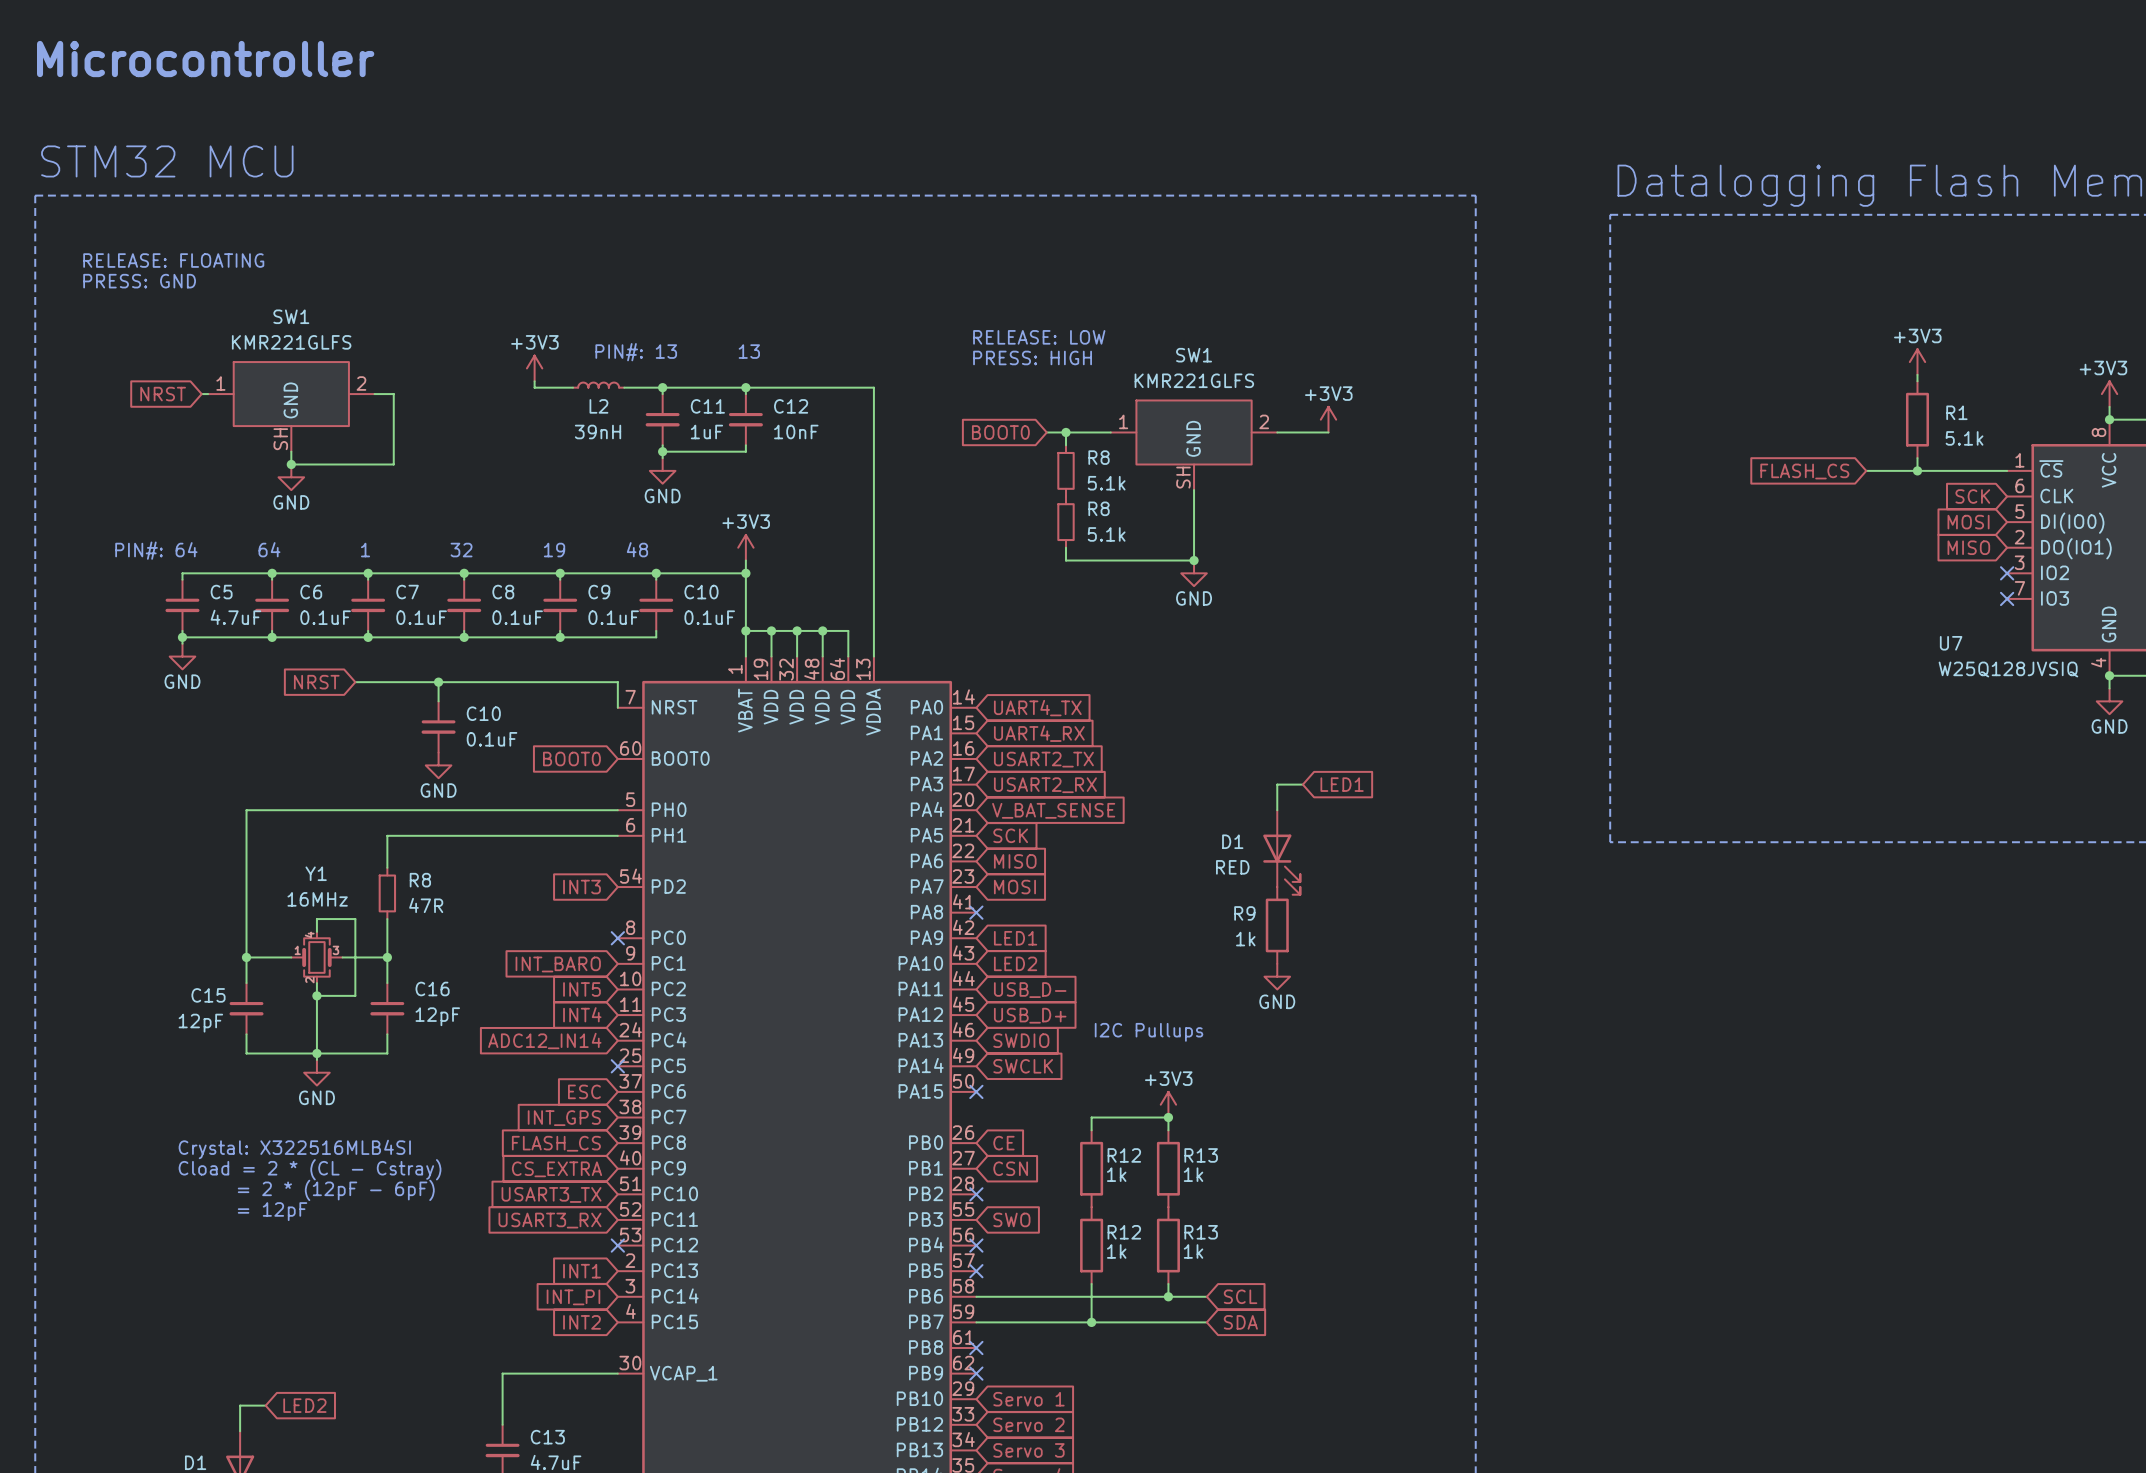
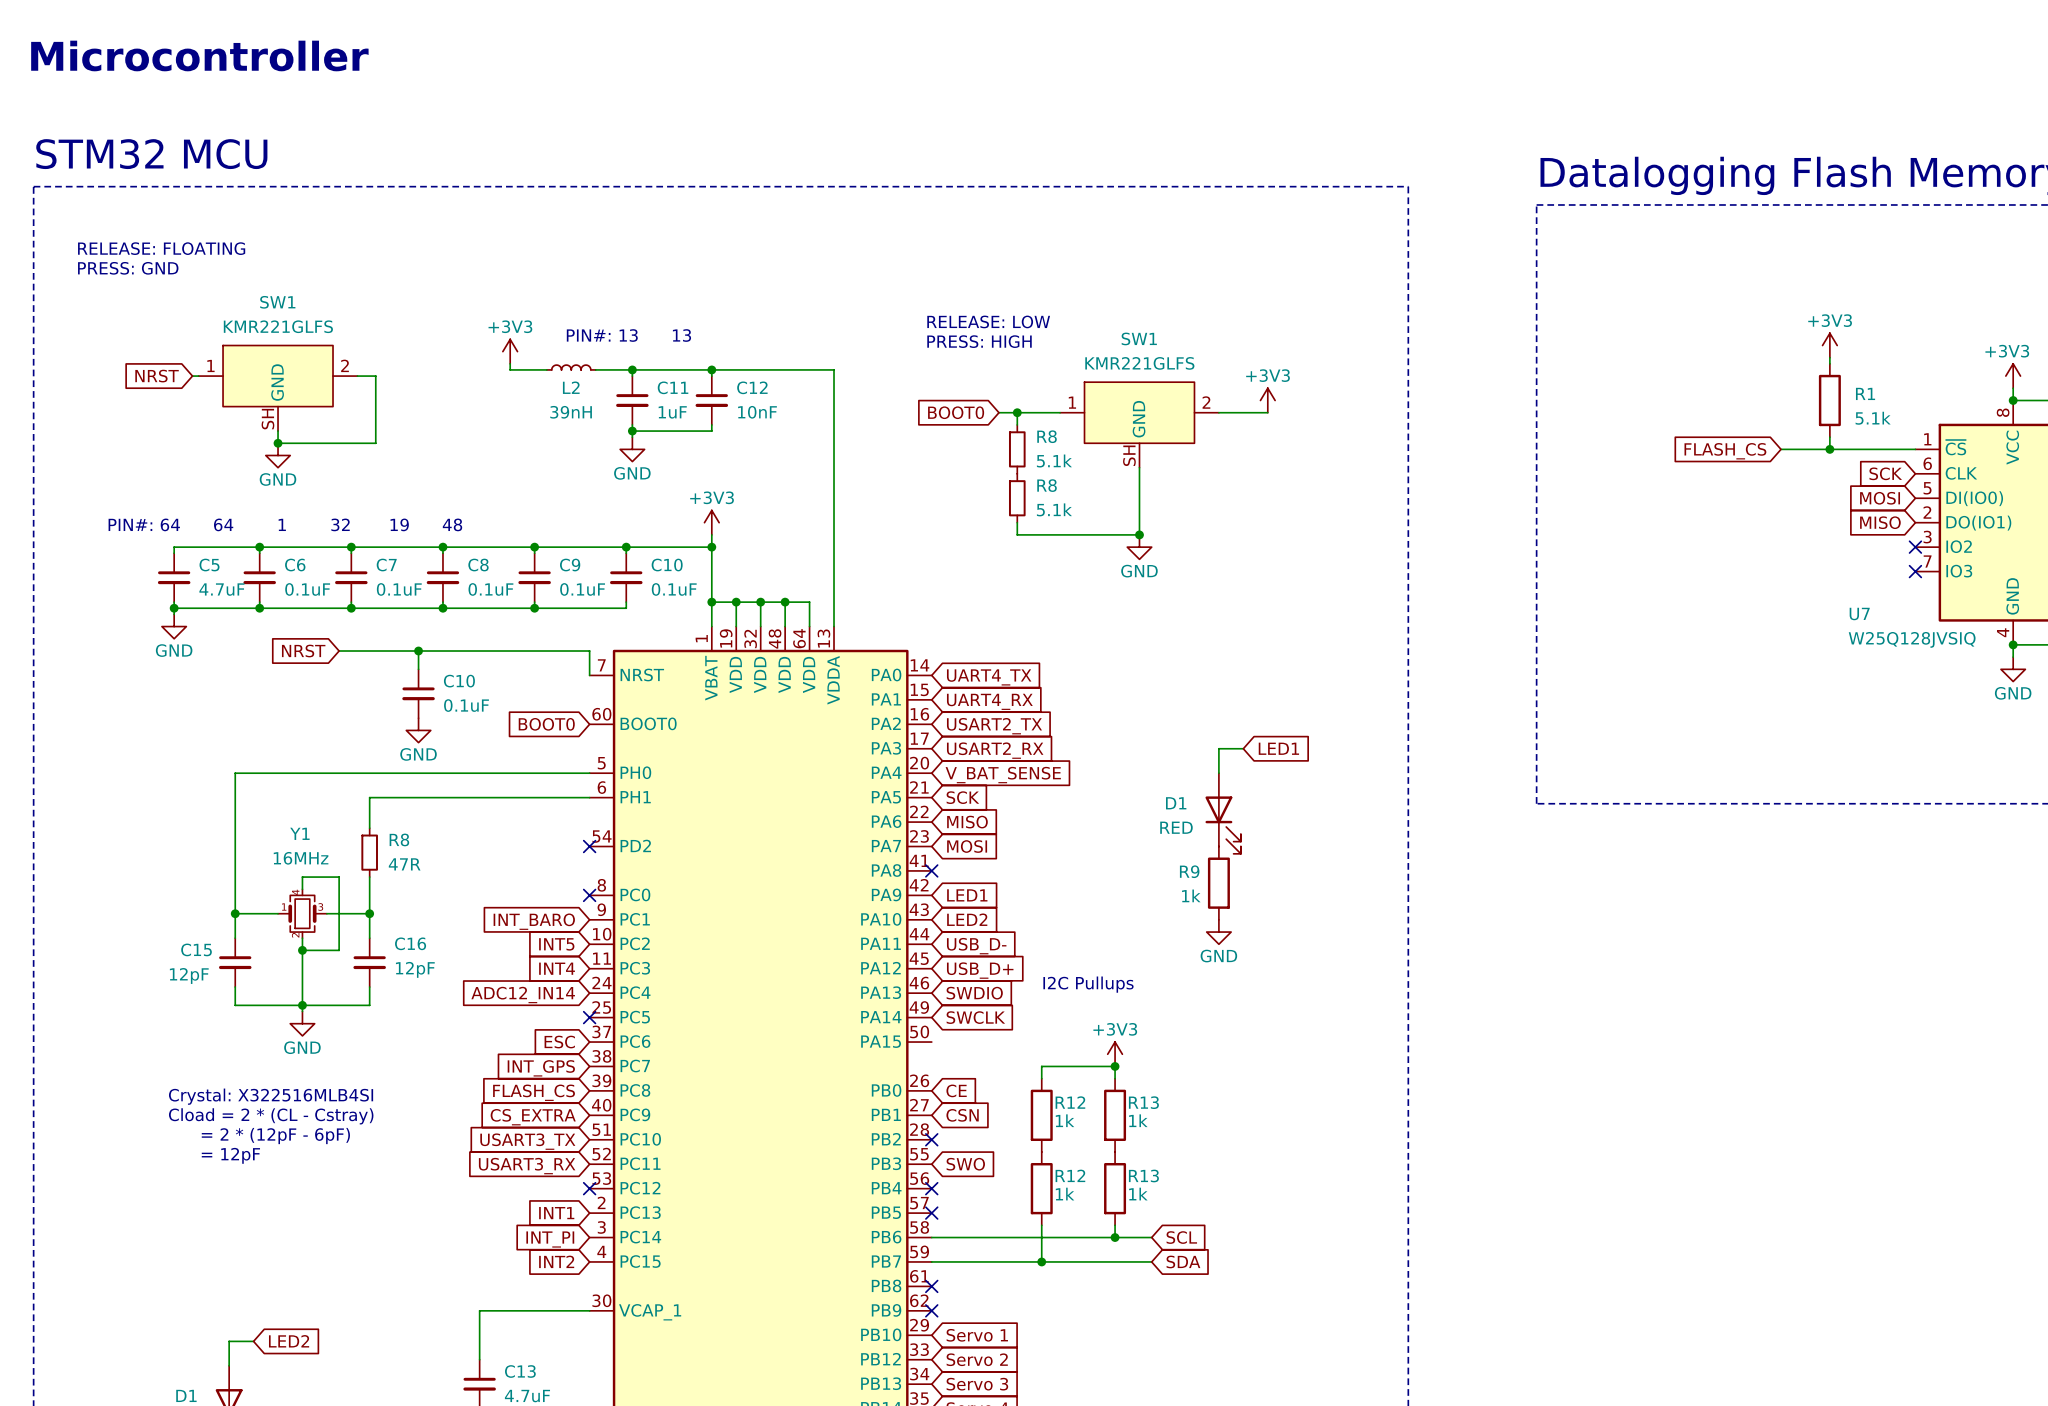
global label: INT3 (582, 887) -> none
no-connect mark: none -> (589, 846)
no-connect mark: (976, 1091) -> none

